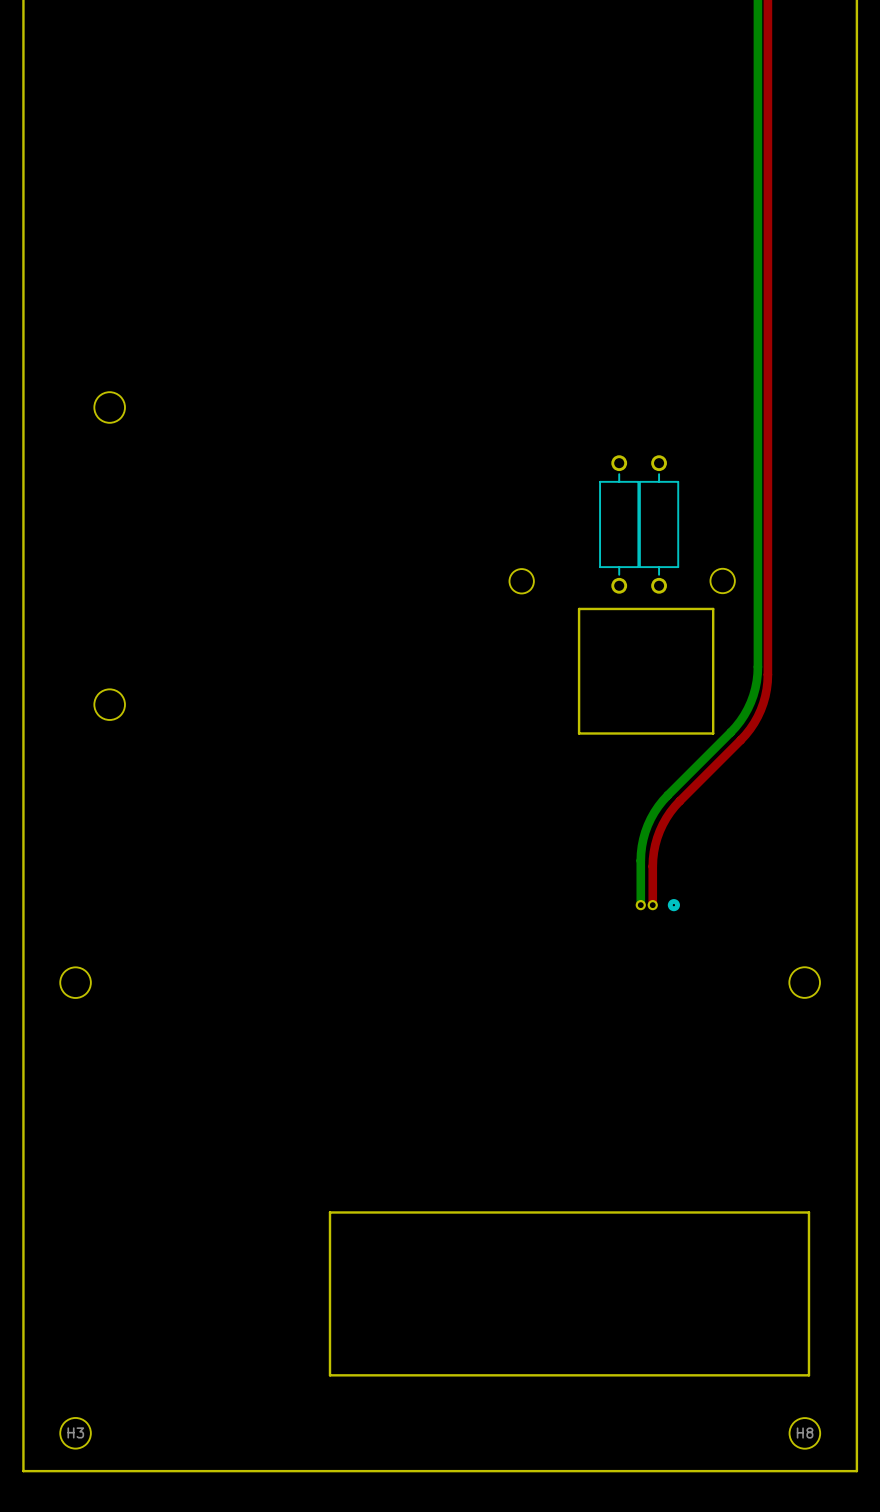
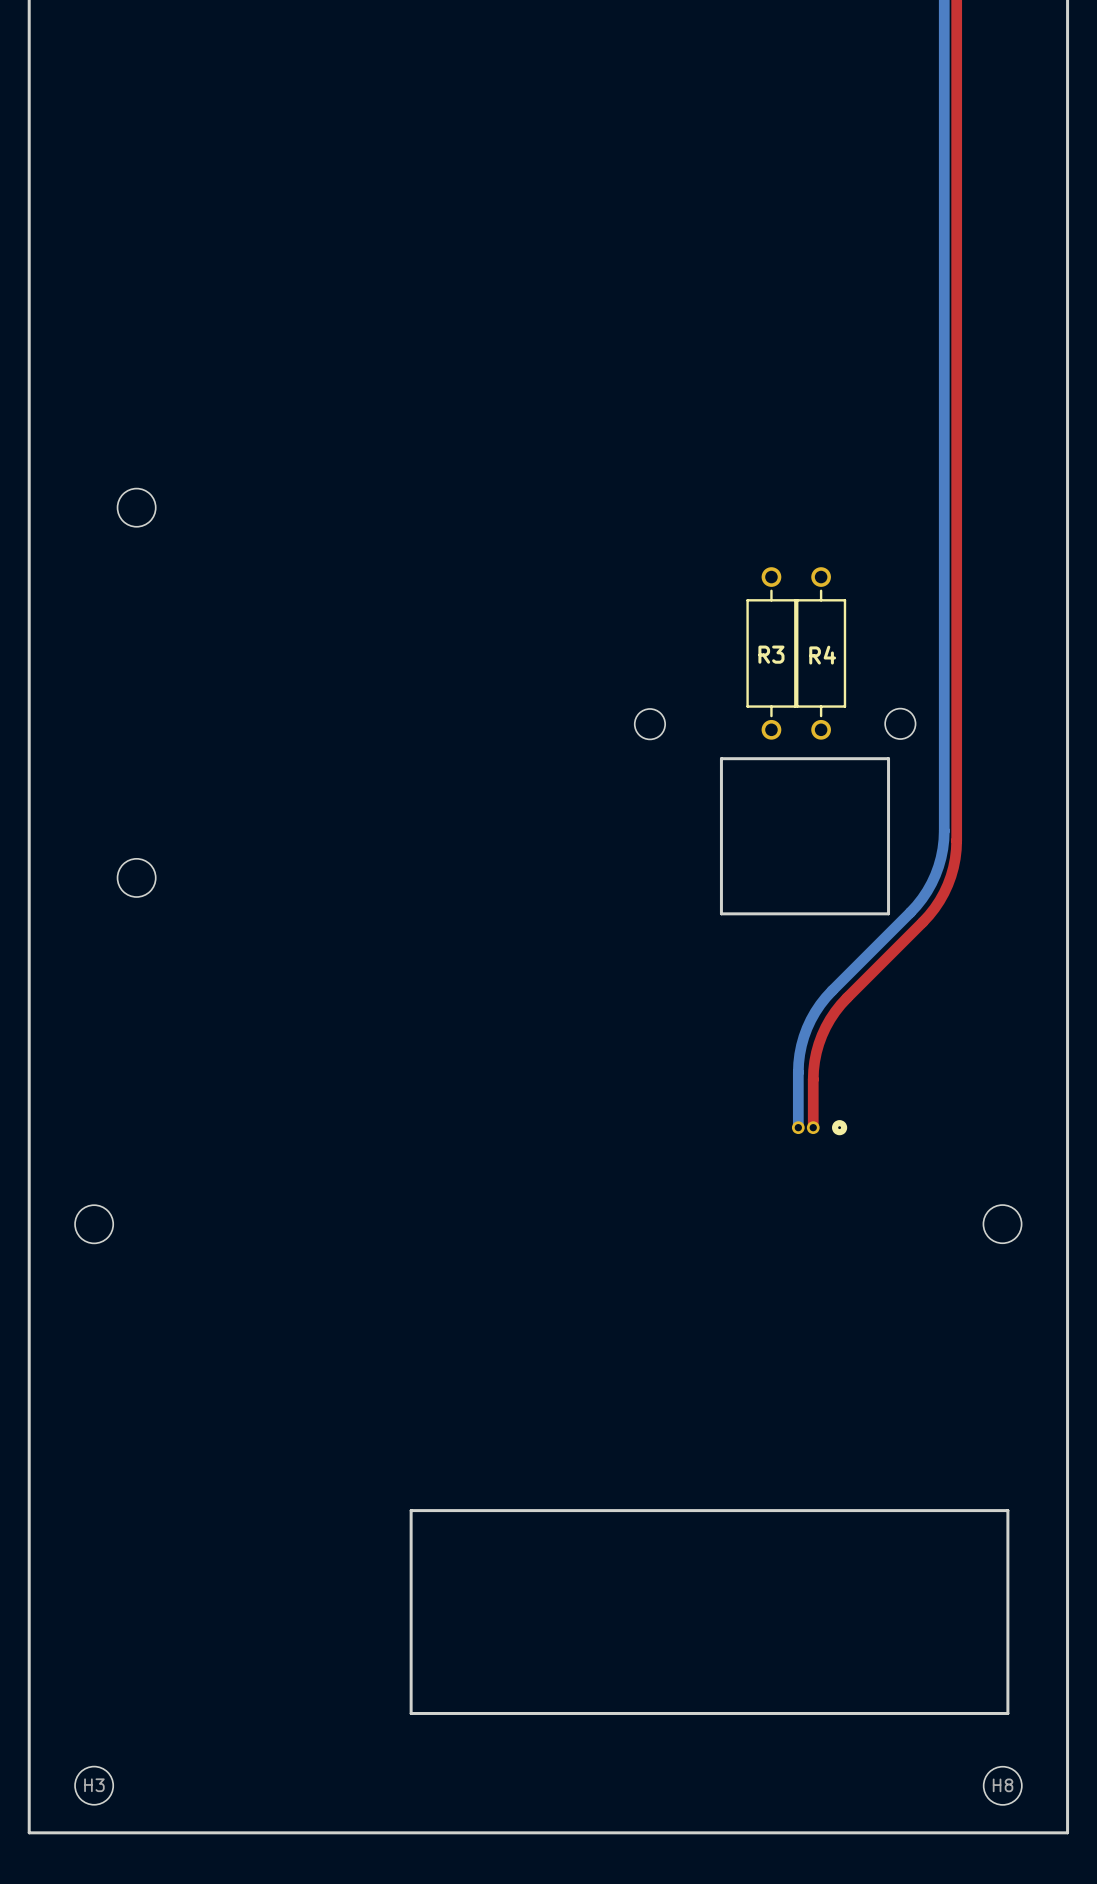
R3 name: none -> R3 (771, 654)
R4 name: none -> R4 (822, 655)

